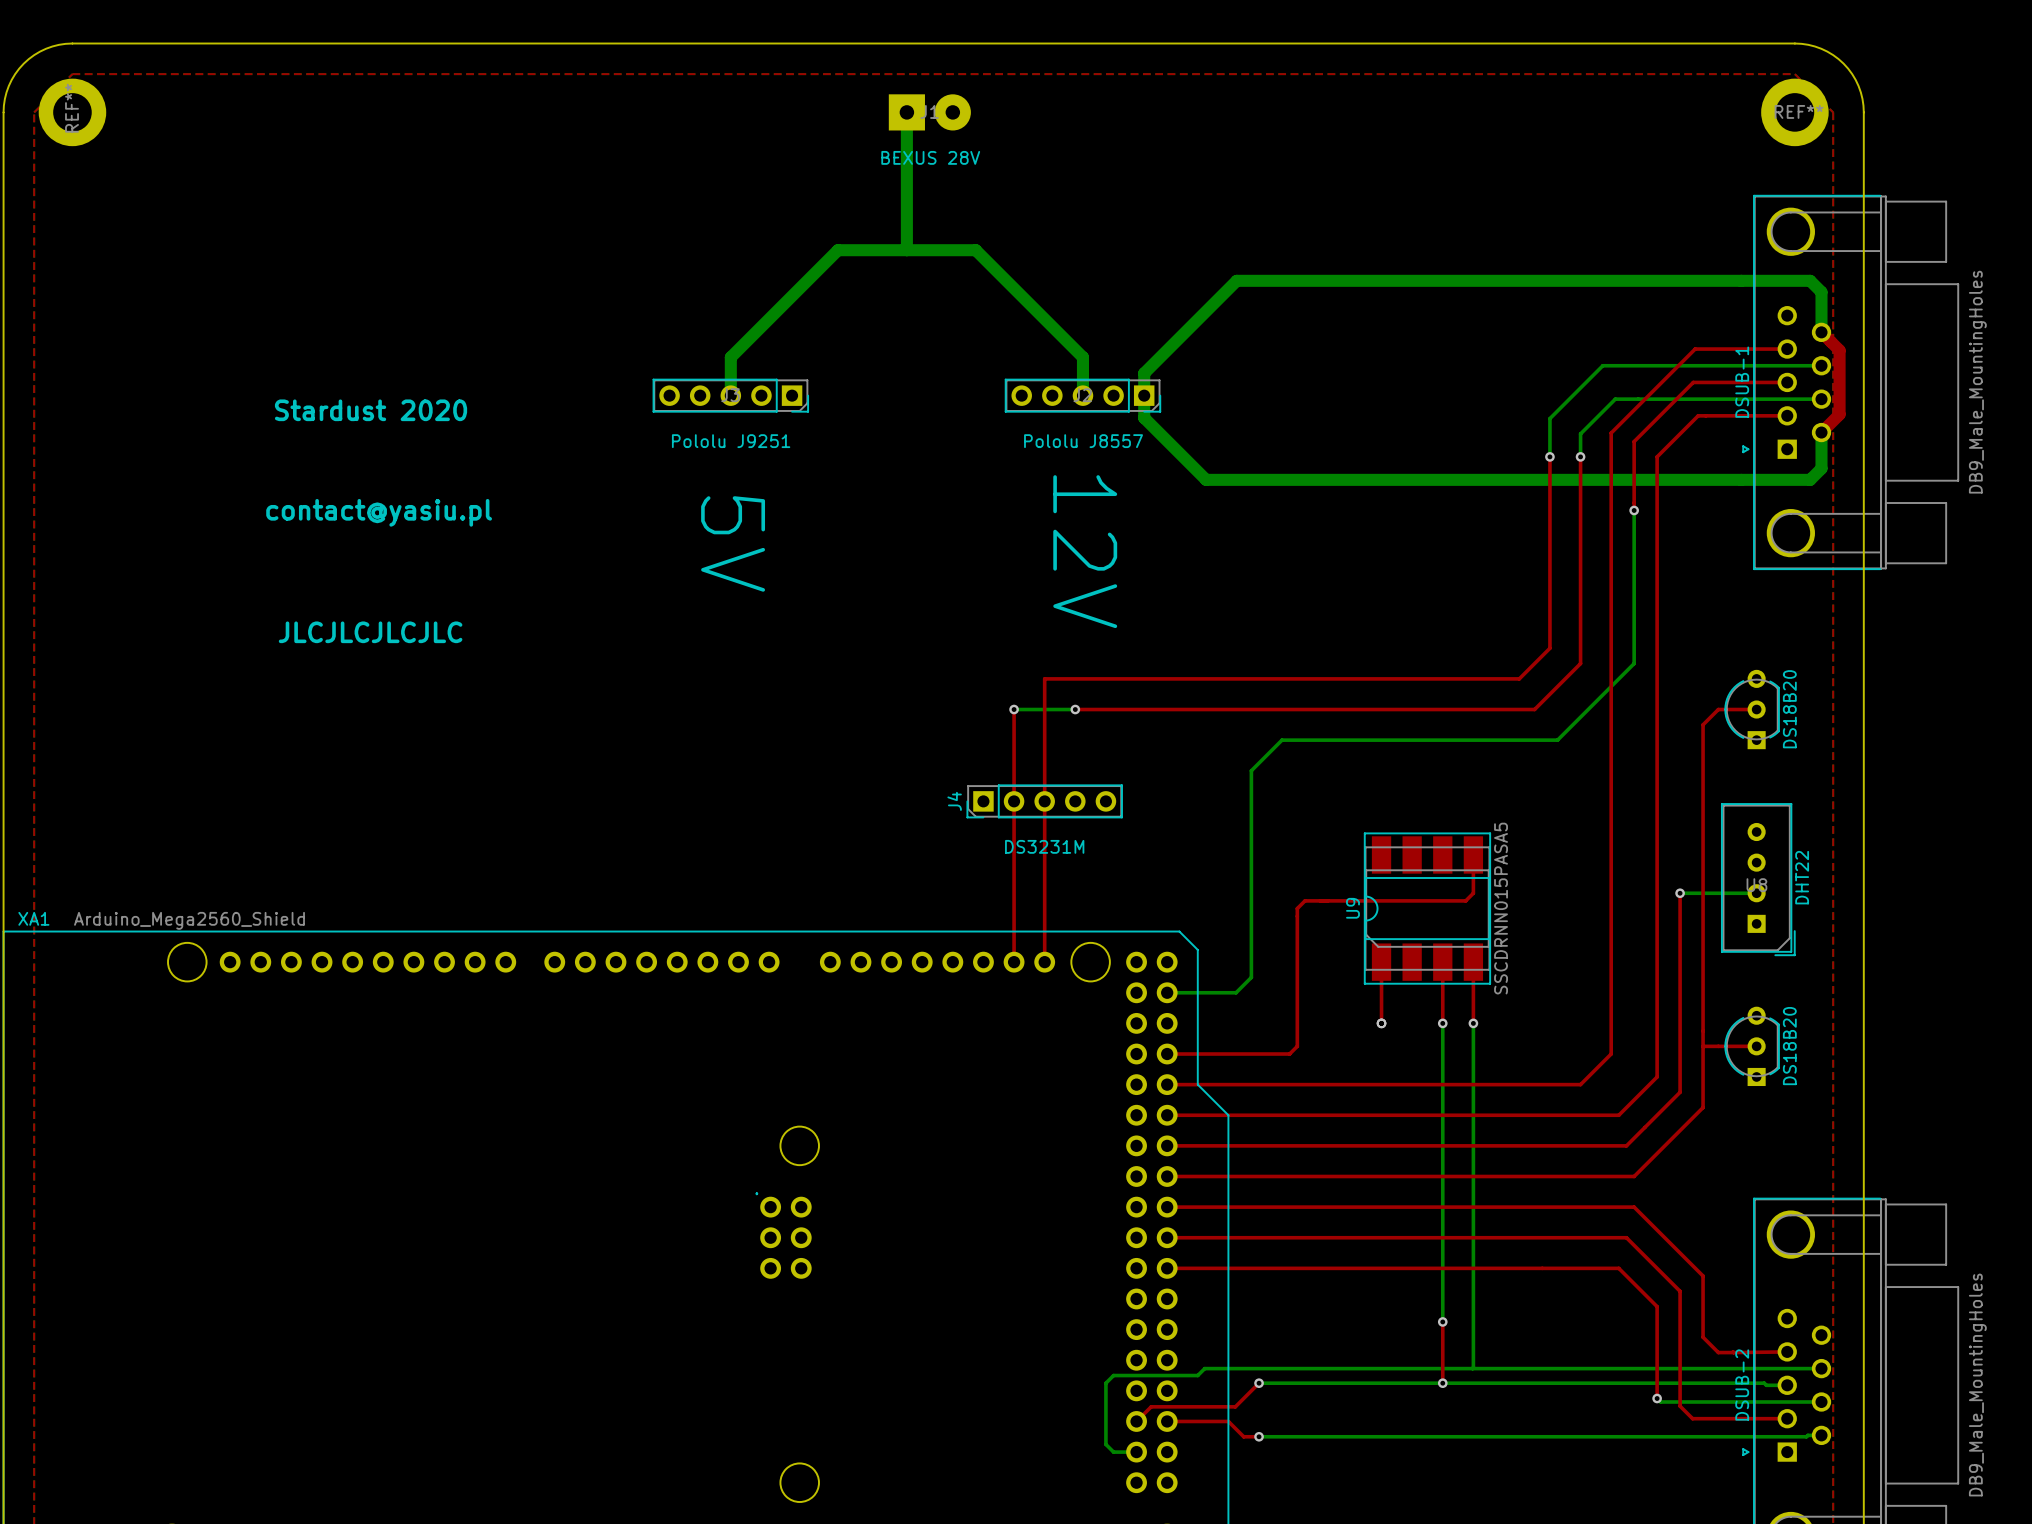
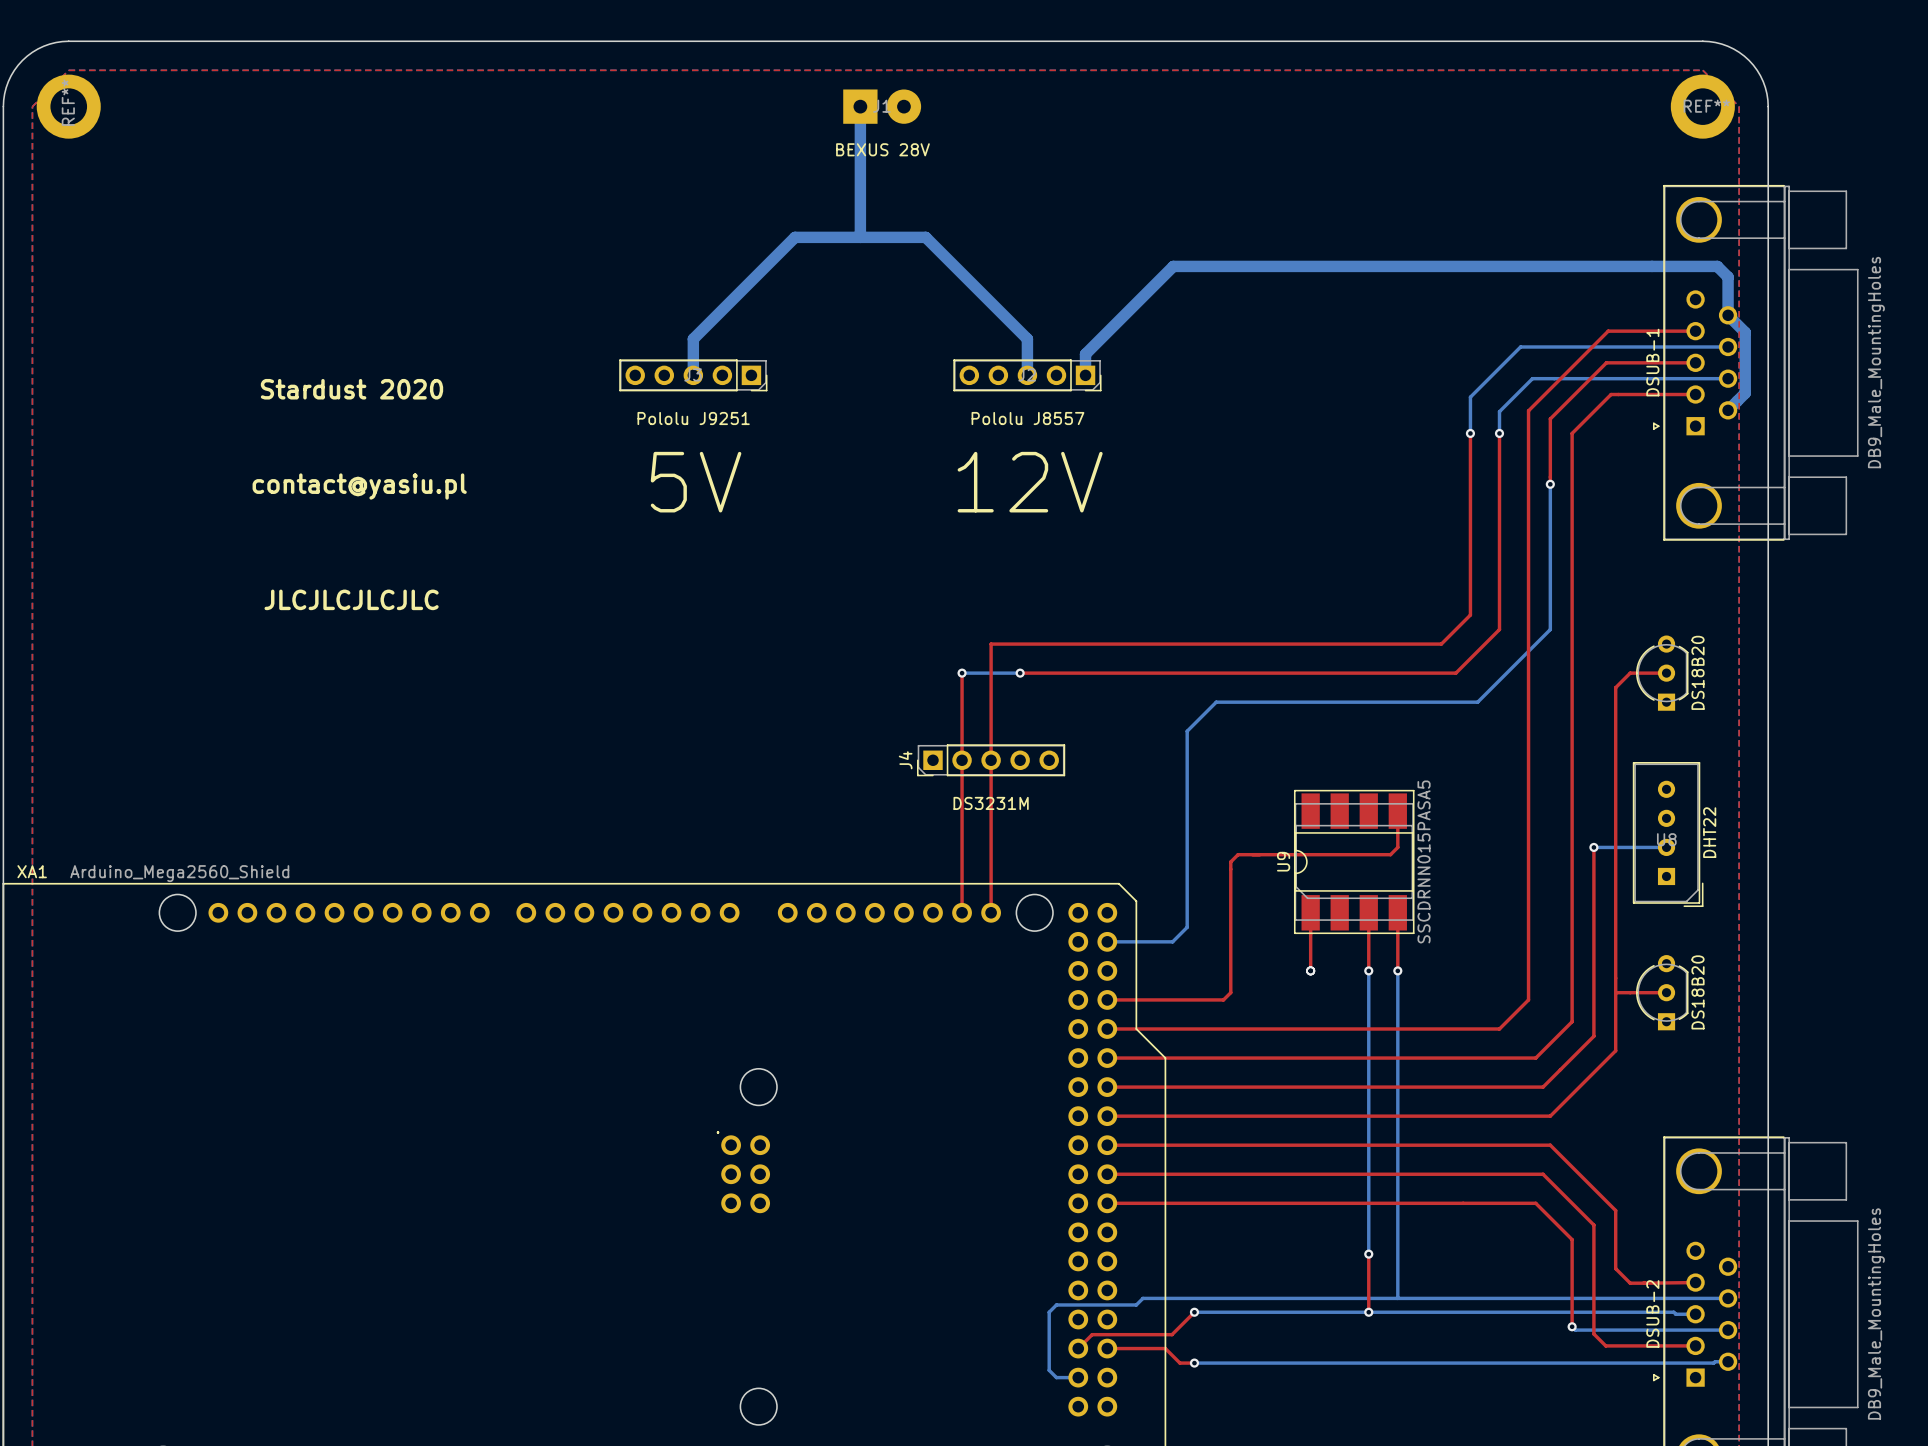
top track: (1821, 332) (1839, 350) (1839, 414) (1821, 432) -> none
bottom track: (1144, 395) (1144, 417) (1206, 479) (1810, 479) (1821, 468) (1821, 432) -> (1728, 315) (1745, 332) (1745, 393) (1728, 410)
text rotation: 0° (733, 543) -> 90° counterclockwise (696, 482)
text rotation: 0° (1085, 551) -> 90° counterclockwise (1030, 482)

